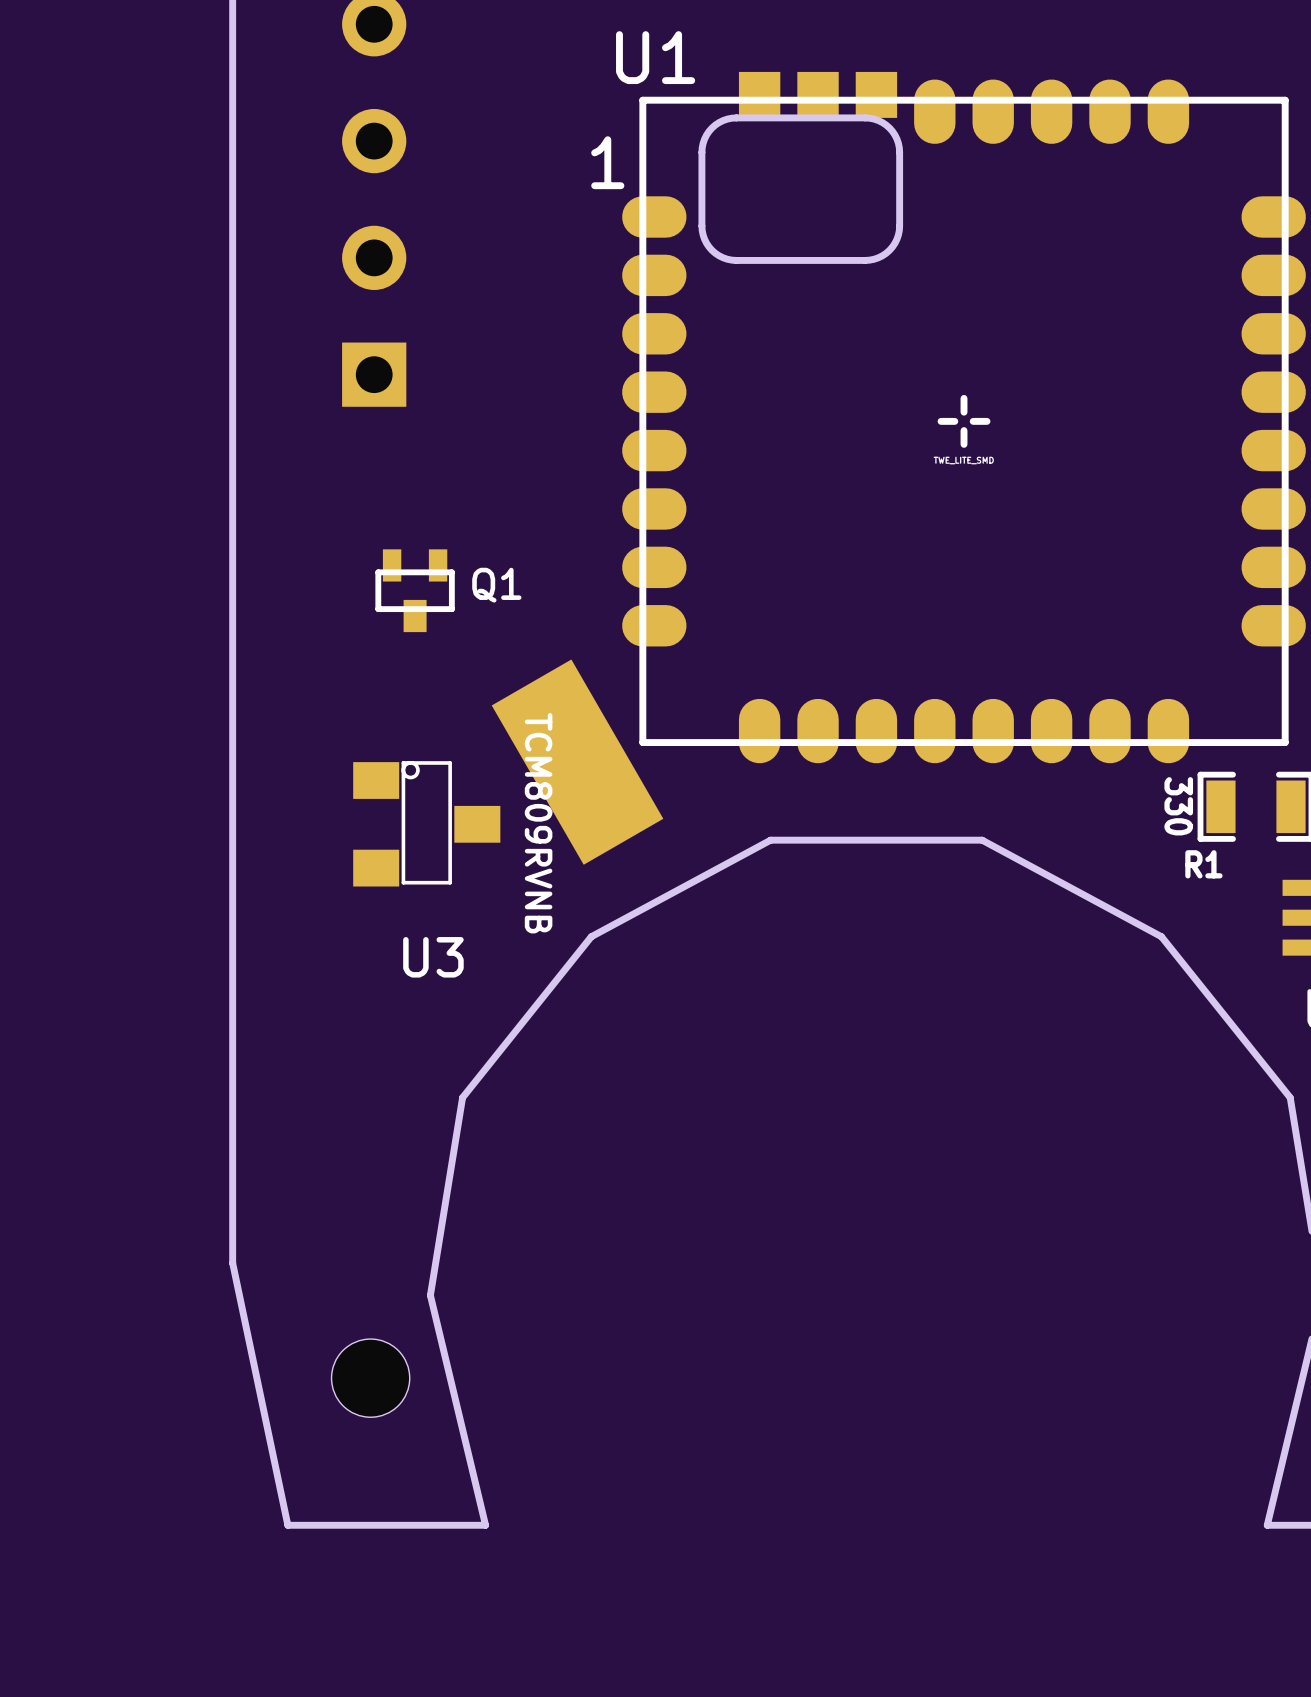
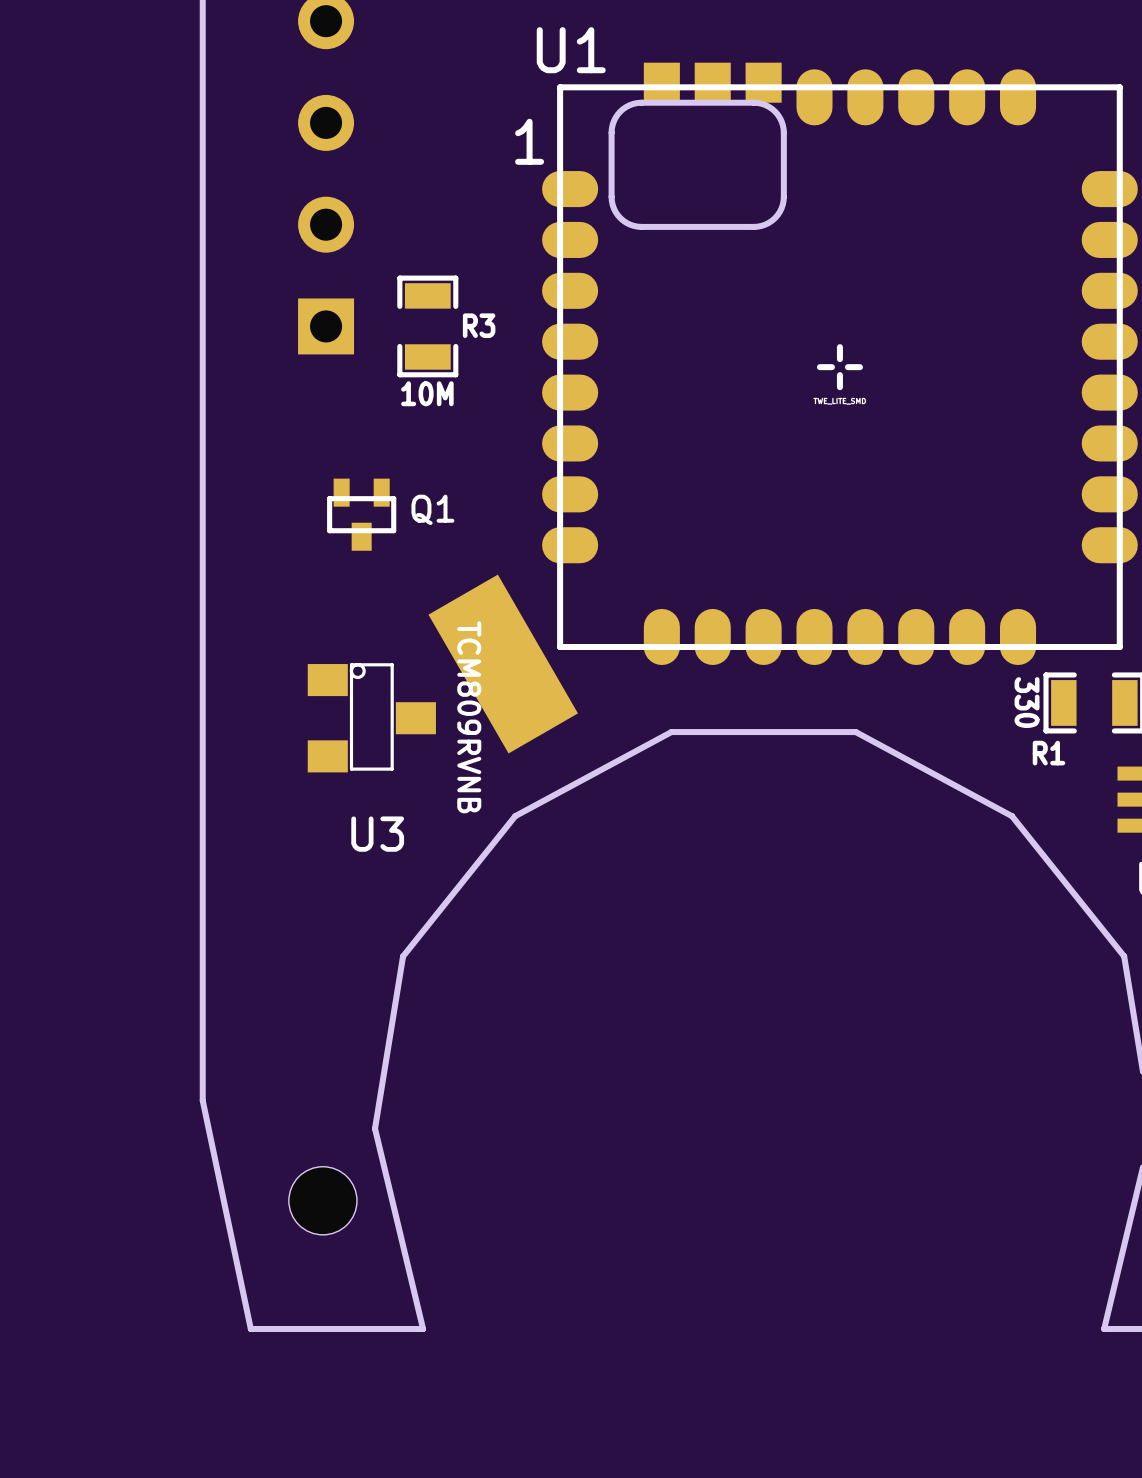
R3: none -> 10M (427, 326)

